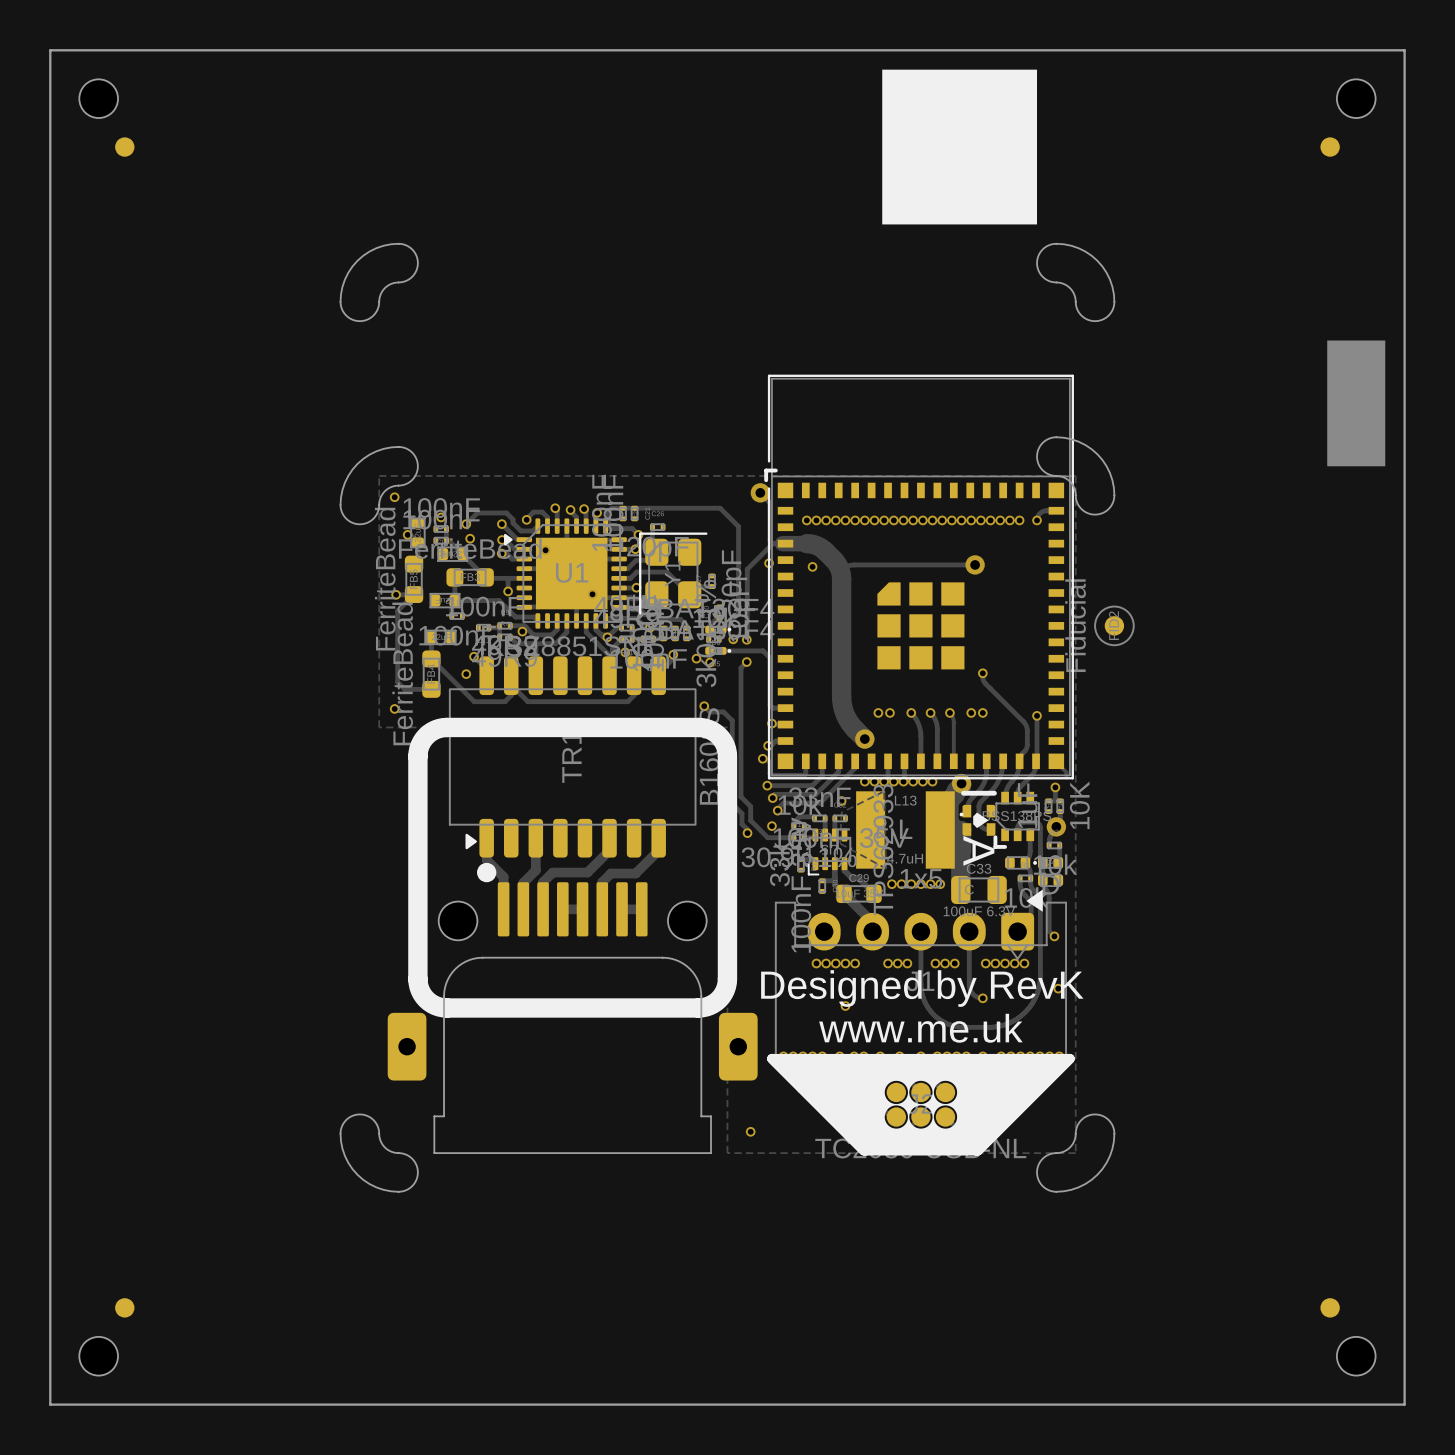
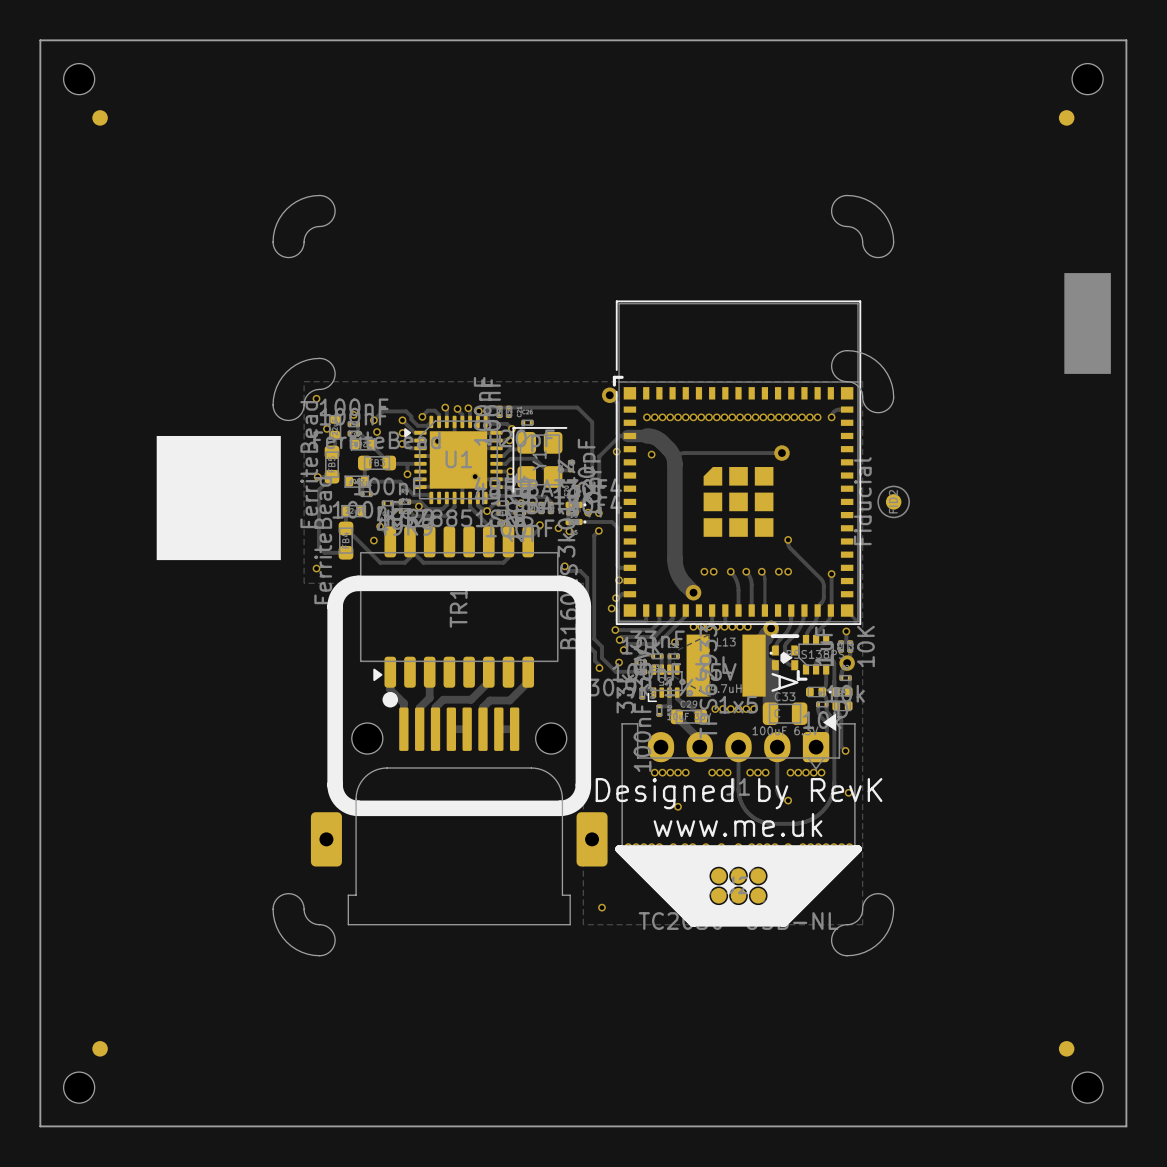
drawing: [882, 69, 1038, 225] -> none
drawing: none -> [156, 435, 281, 561]

